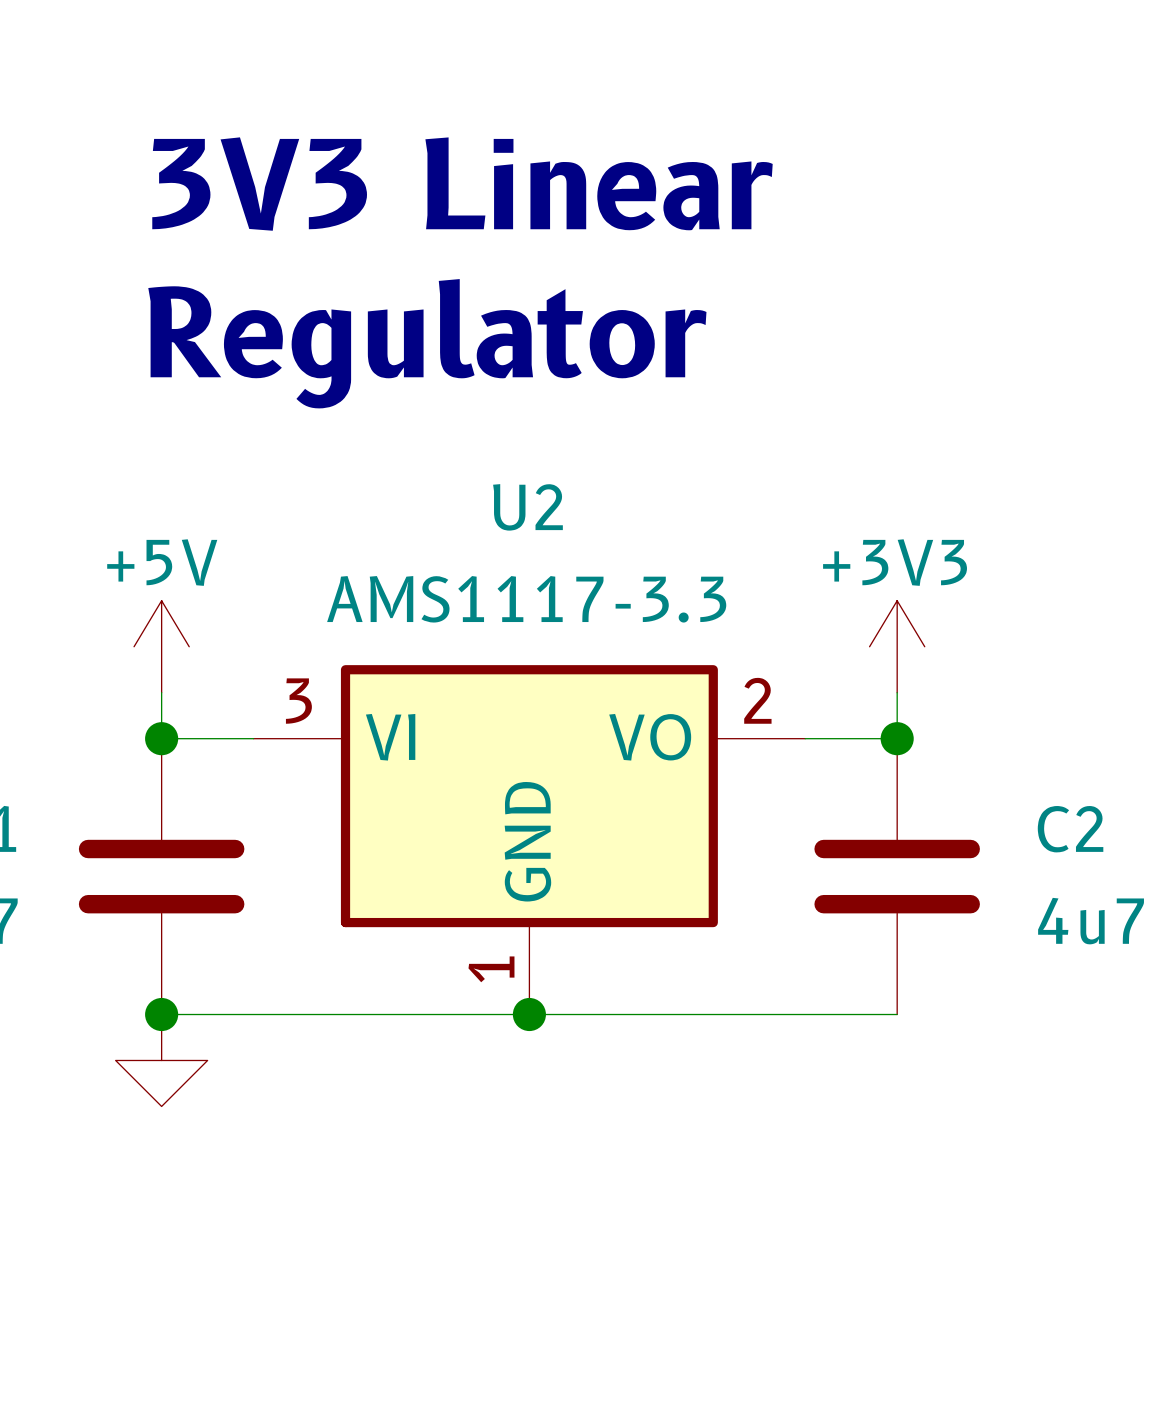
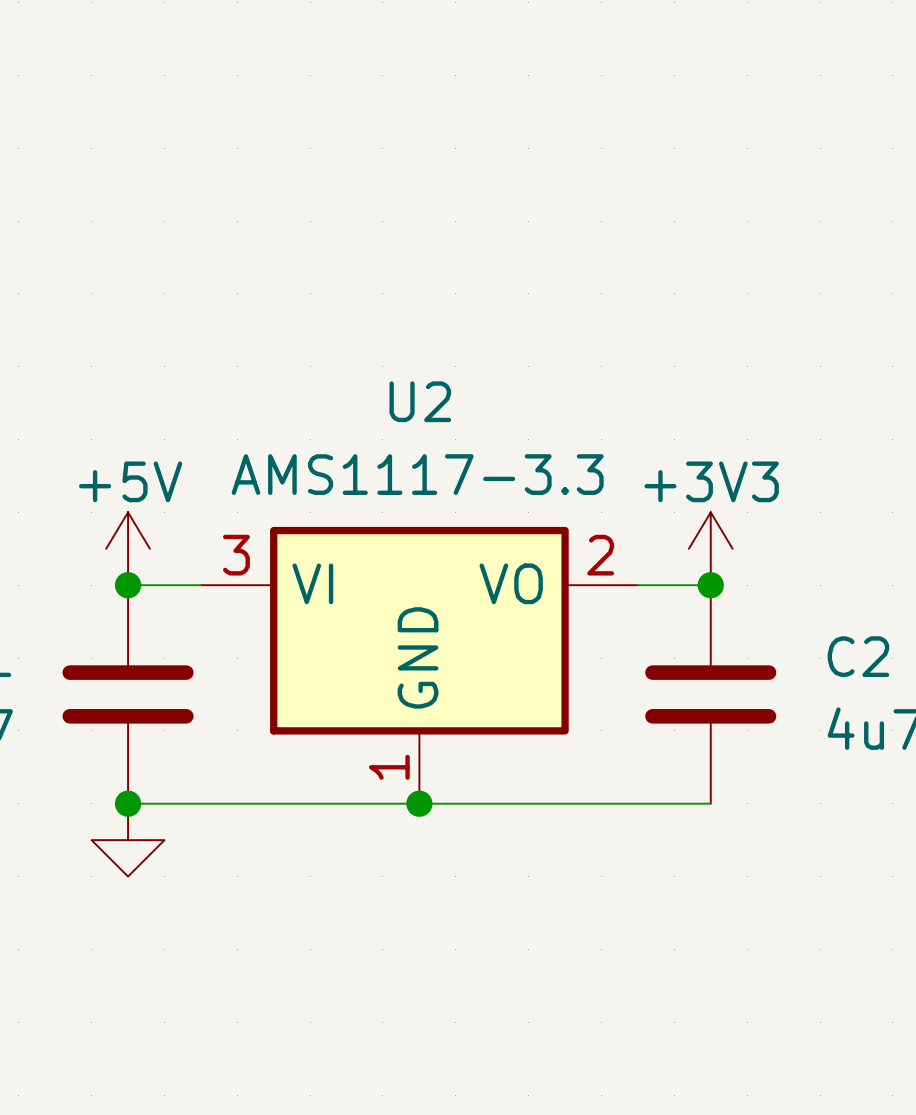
text: 3V3 Linear (462, 184) -> none
text: Regulator (427, 343) -> none
power symbol position: +5V (161, 646) -> +5V (128, 548)
power symbol position: +3V3 (897, 646) -> +3V3 (710, 548)

